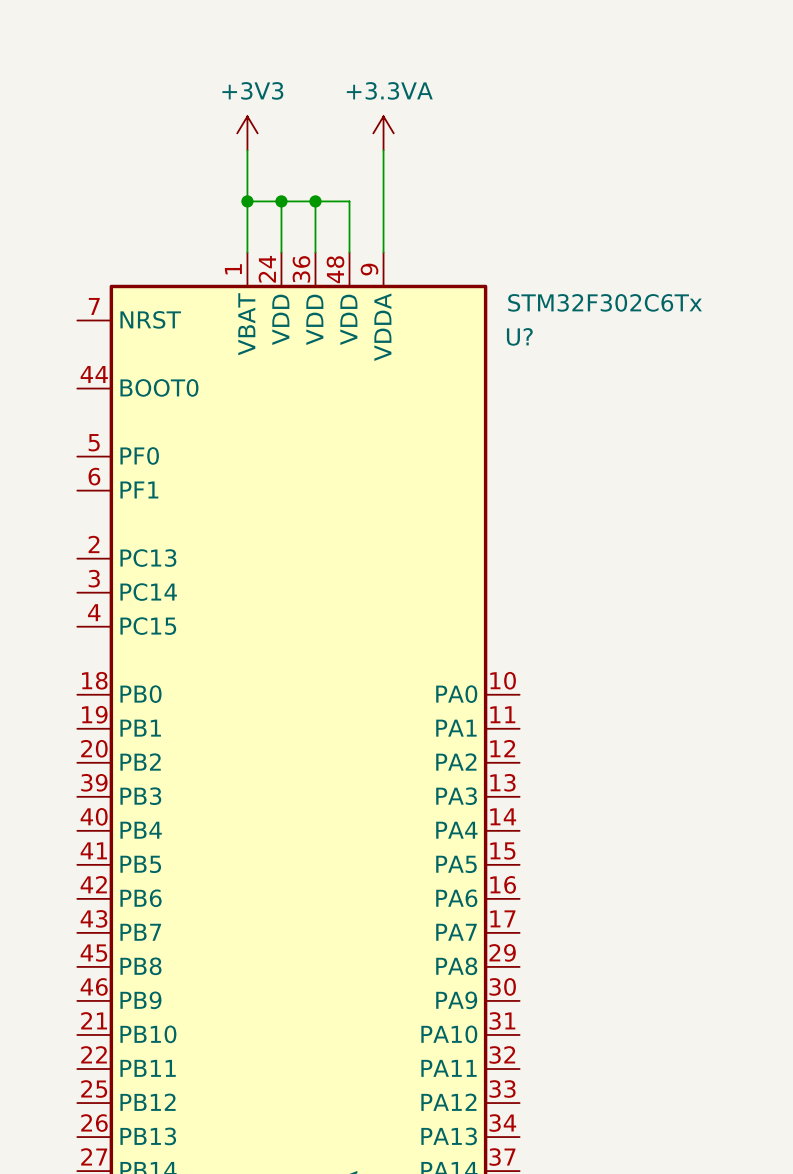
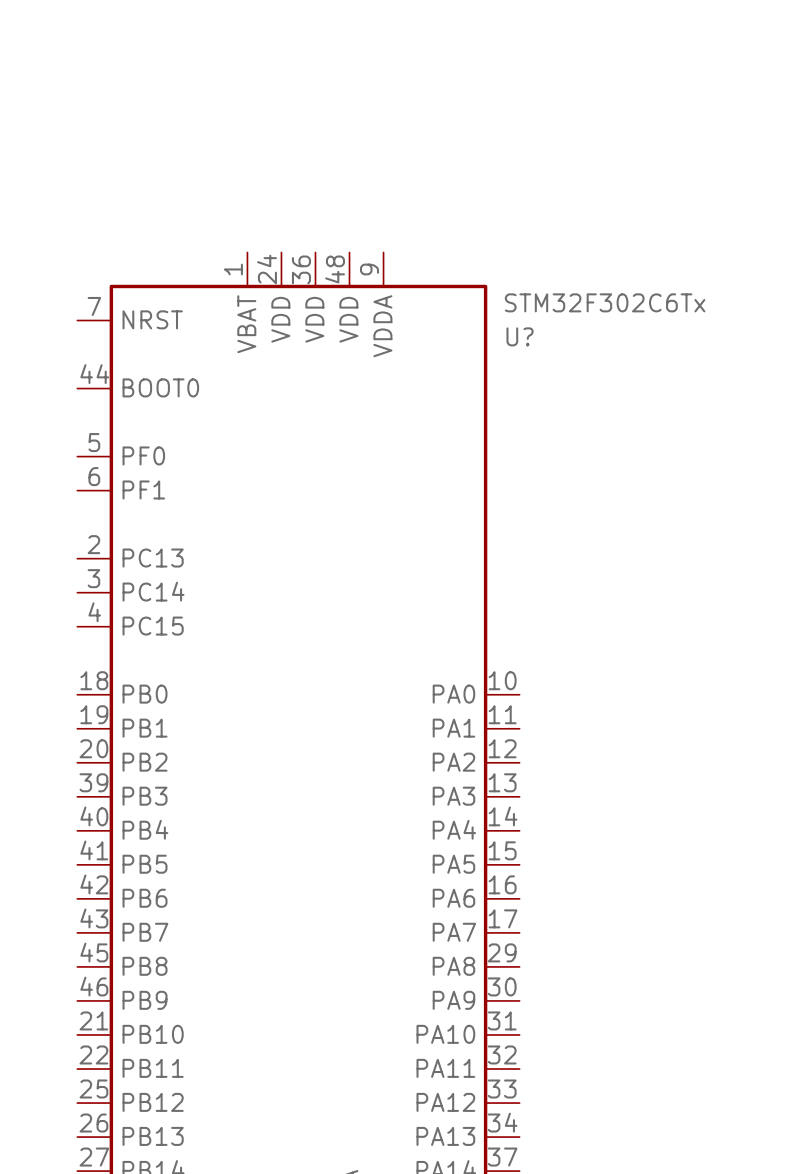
power symbol: +3V3 (247, 133) -> none
power symbol: +3.3VA (383, 133) -> none
wire: (247, 150) (247, 252) -> none
wire: (383, 150) (383, 252) -> none
wire: (247, 201) (349, 201) (349, 252) -> none
junction: (247, 201) -> none
wire: (281, 201) (281, 252) -> none
junction: (281, 201) -> none
wire: (315, 201) (315, 252) -> none
junction: (315, 201) -> none

